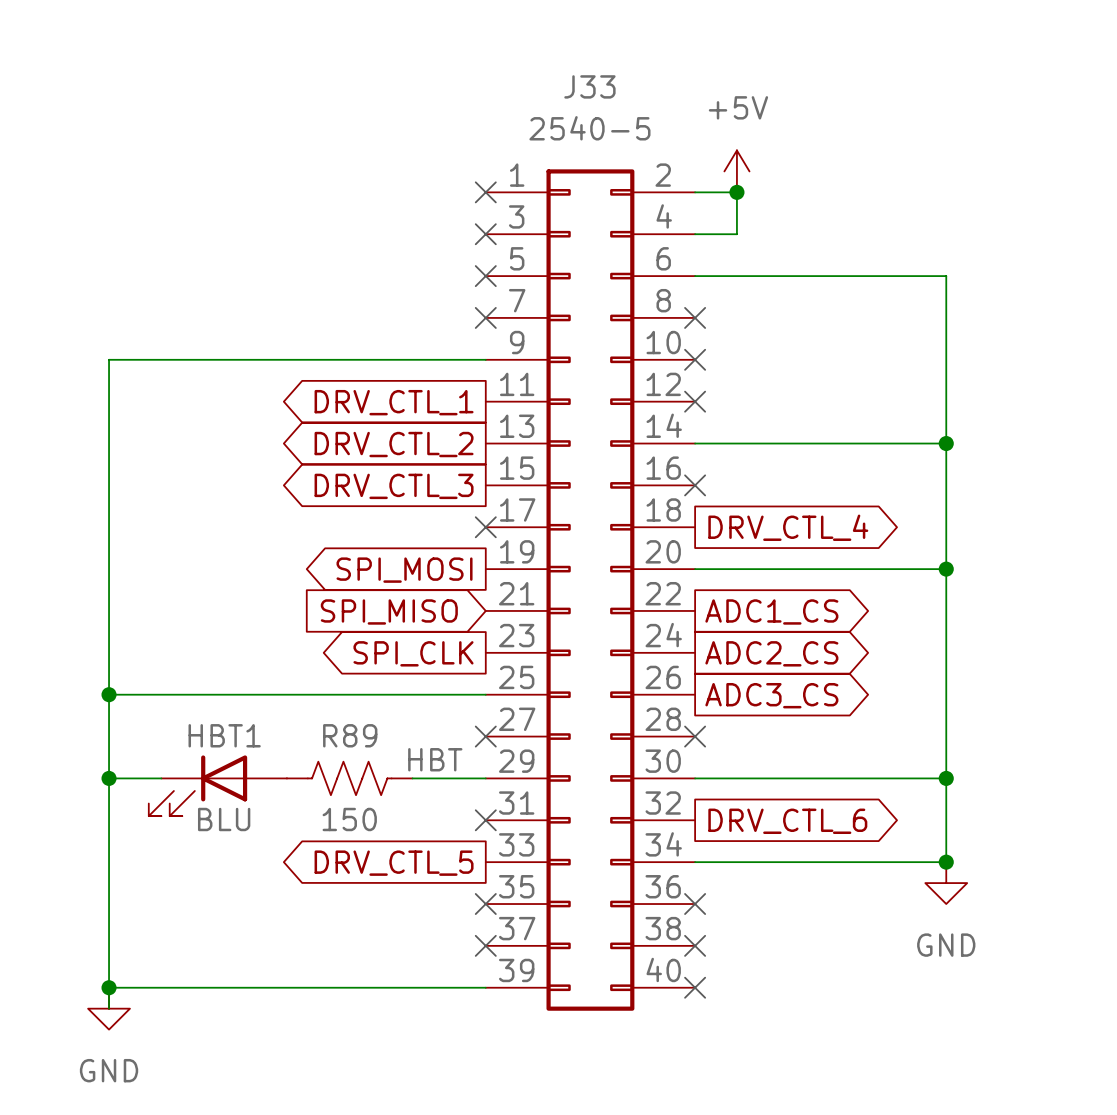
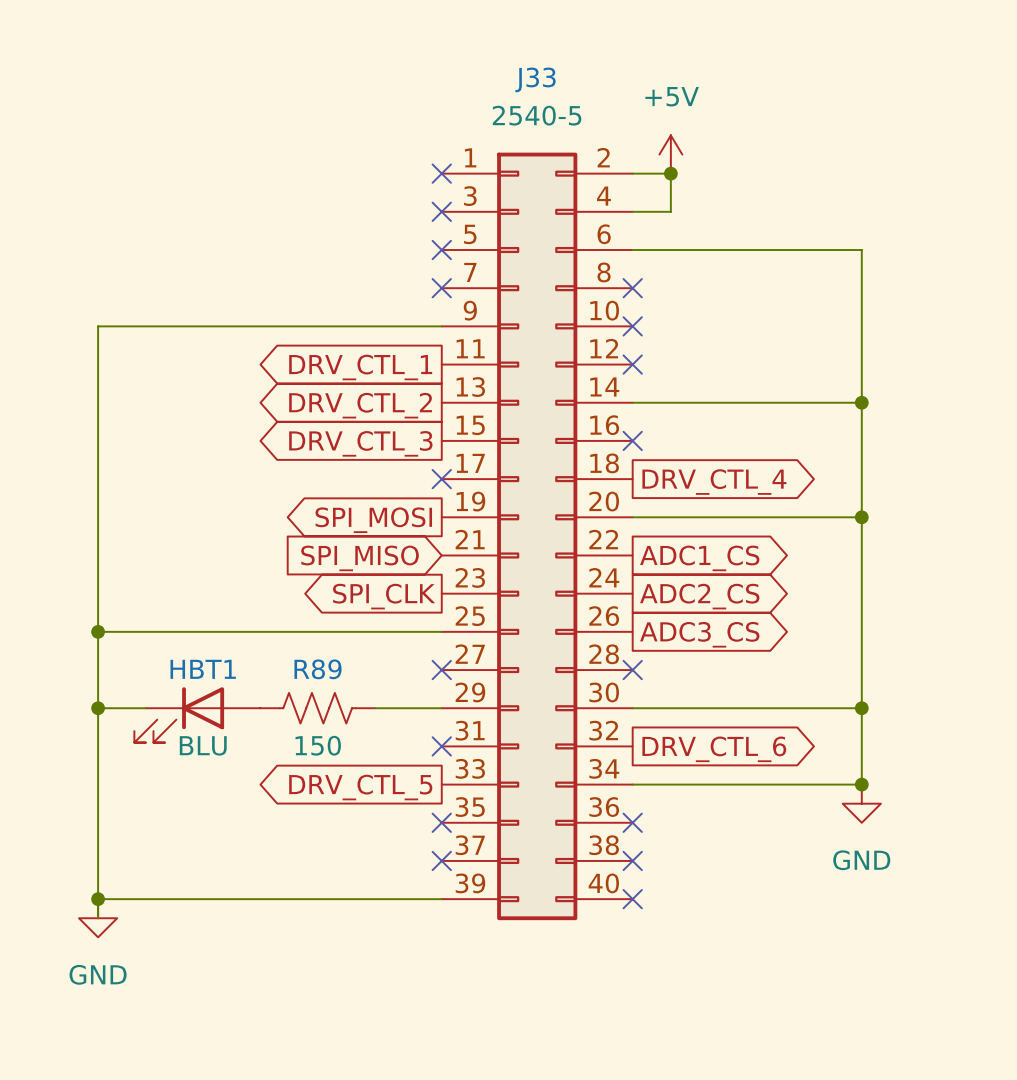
label: HBT (435, 759) -> none

